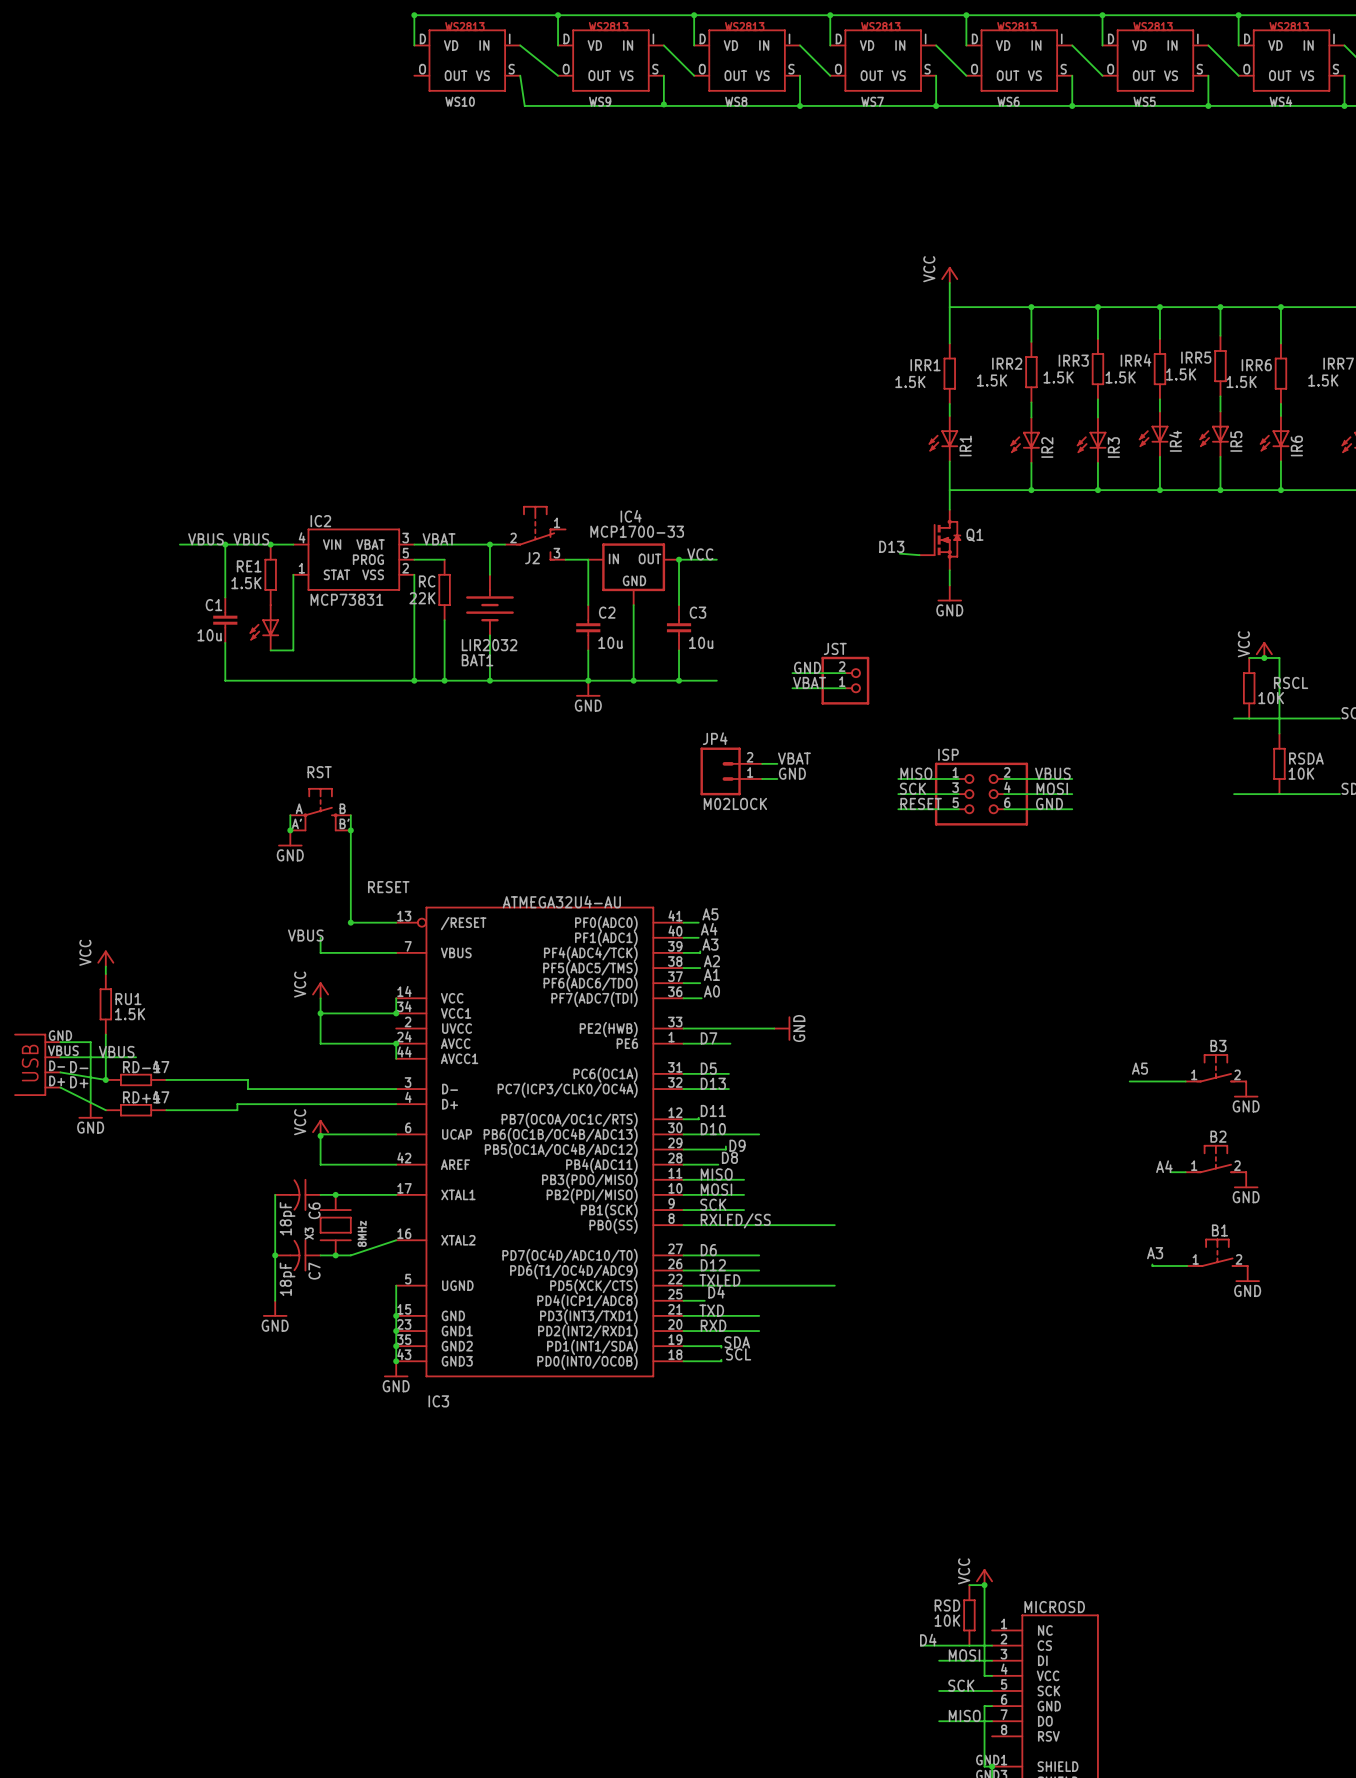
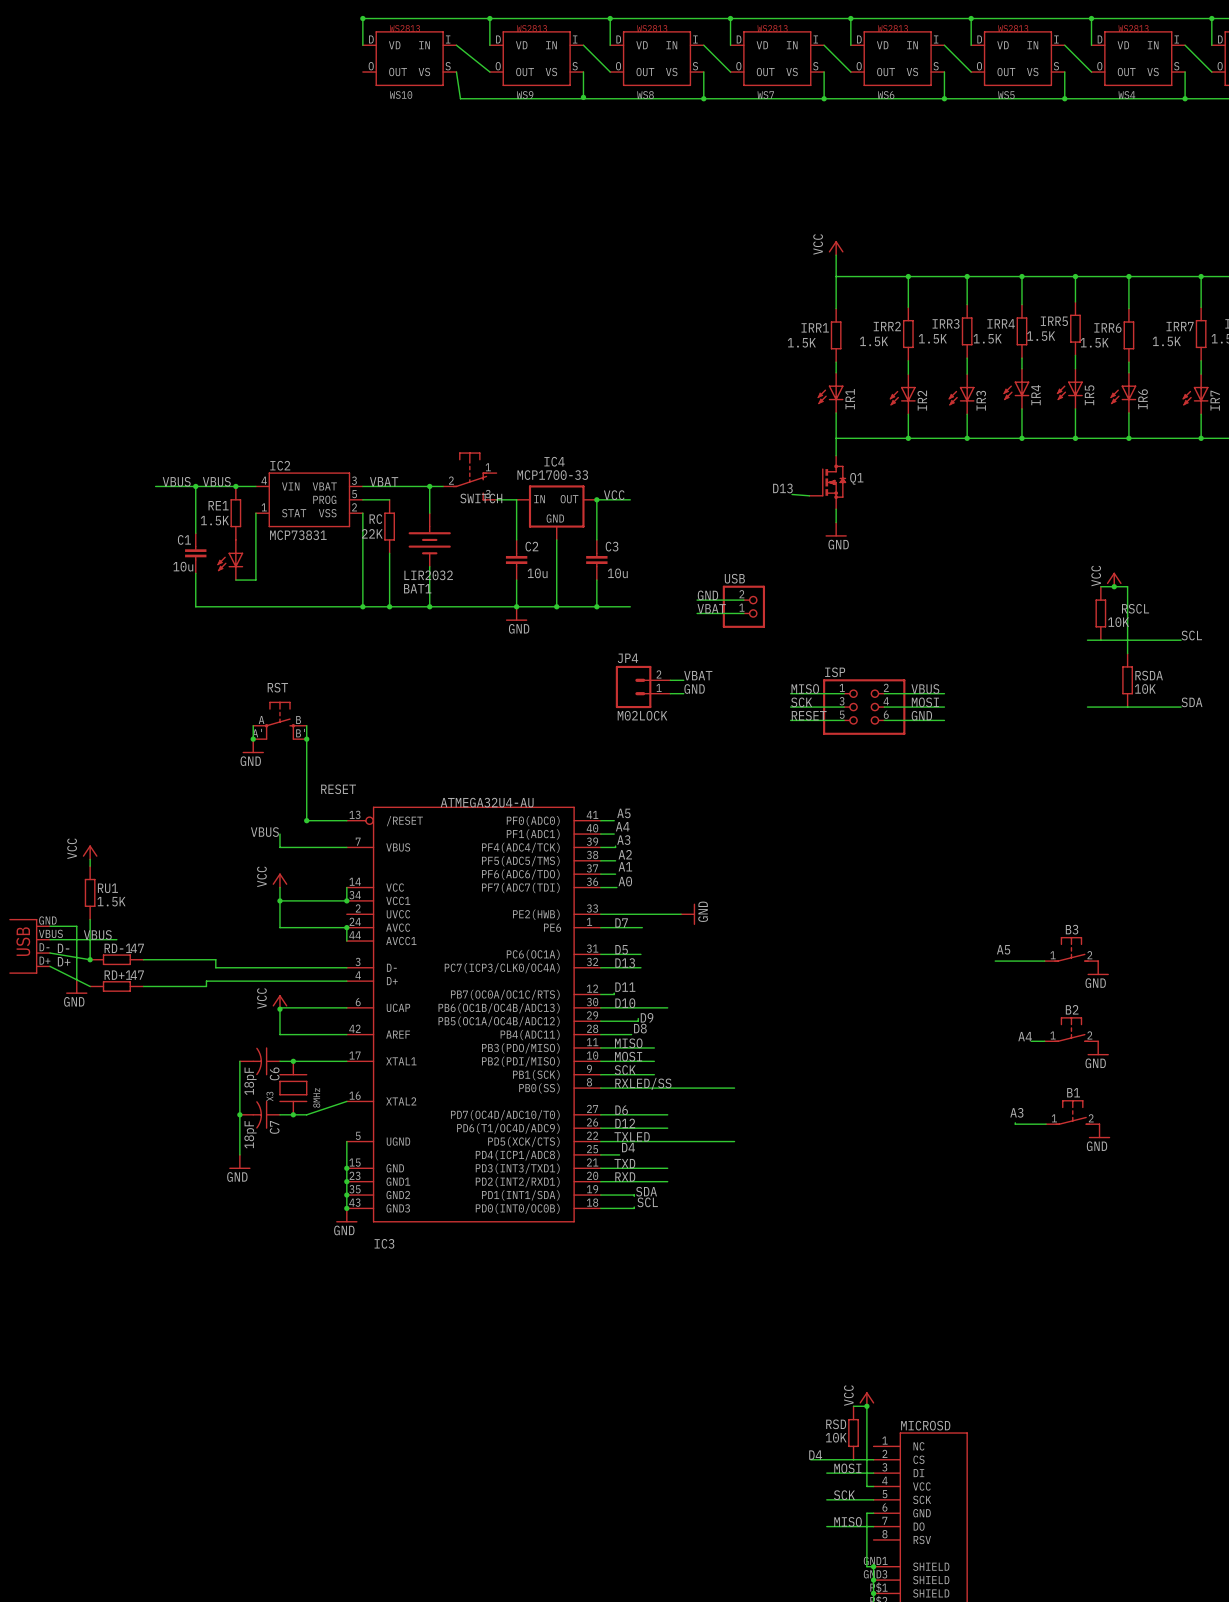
J2 name: J2 (532, 558) -> SWITCH (481, 498)
JST name: JST (835, 648) -> USB (734, 578)

